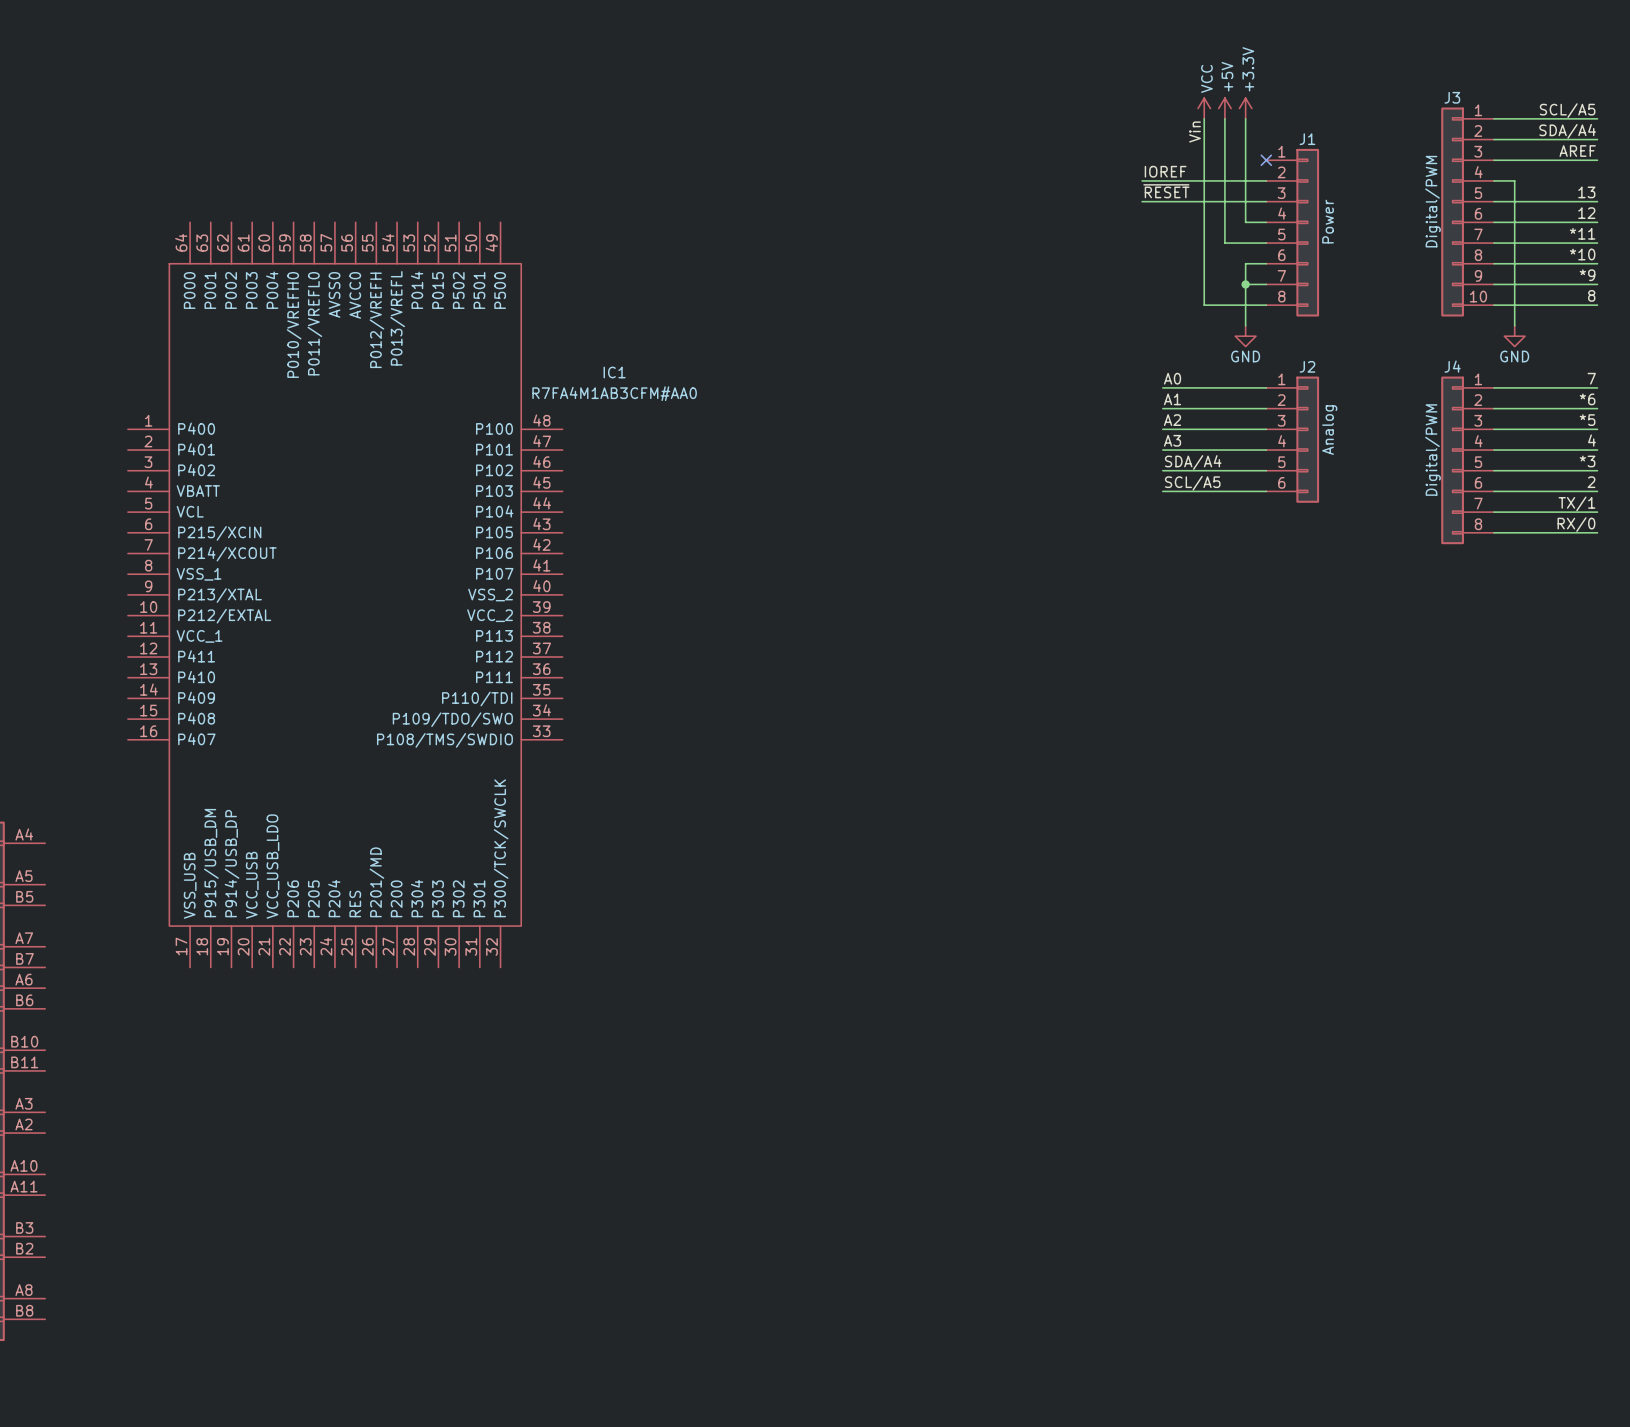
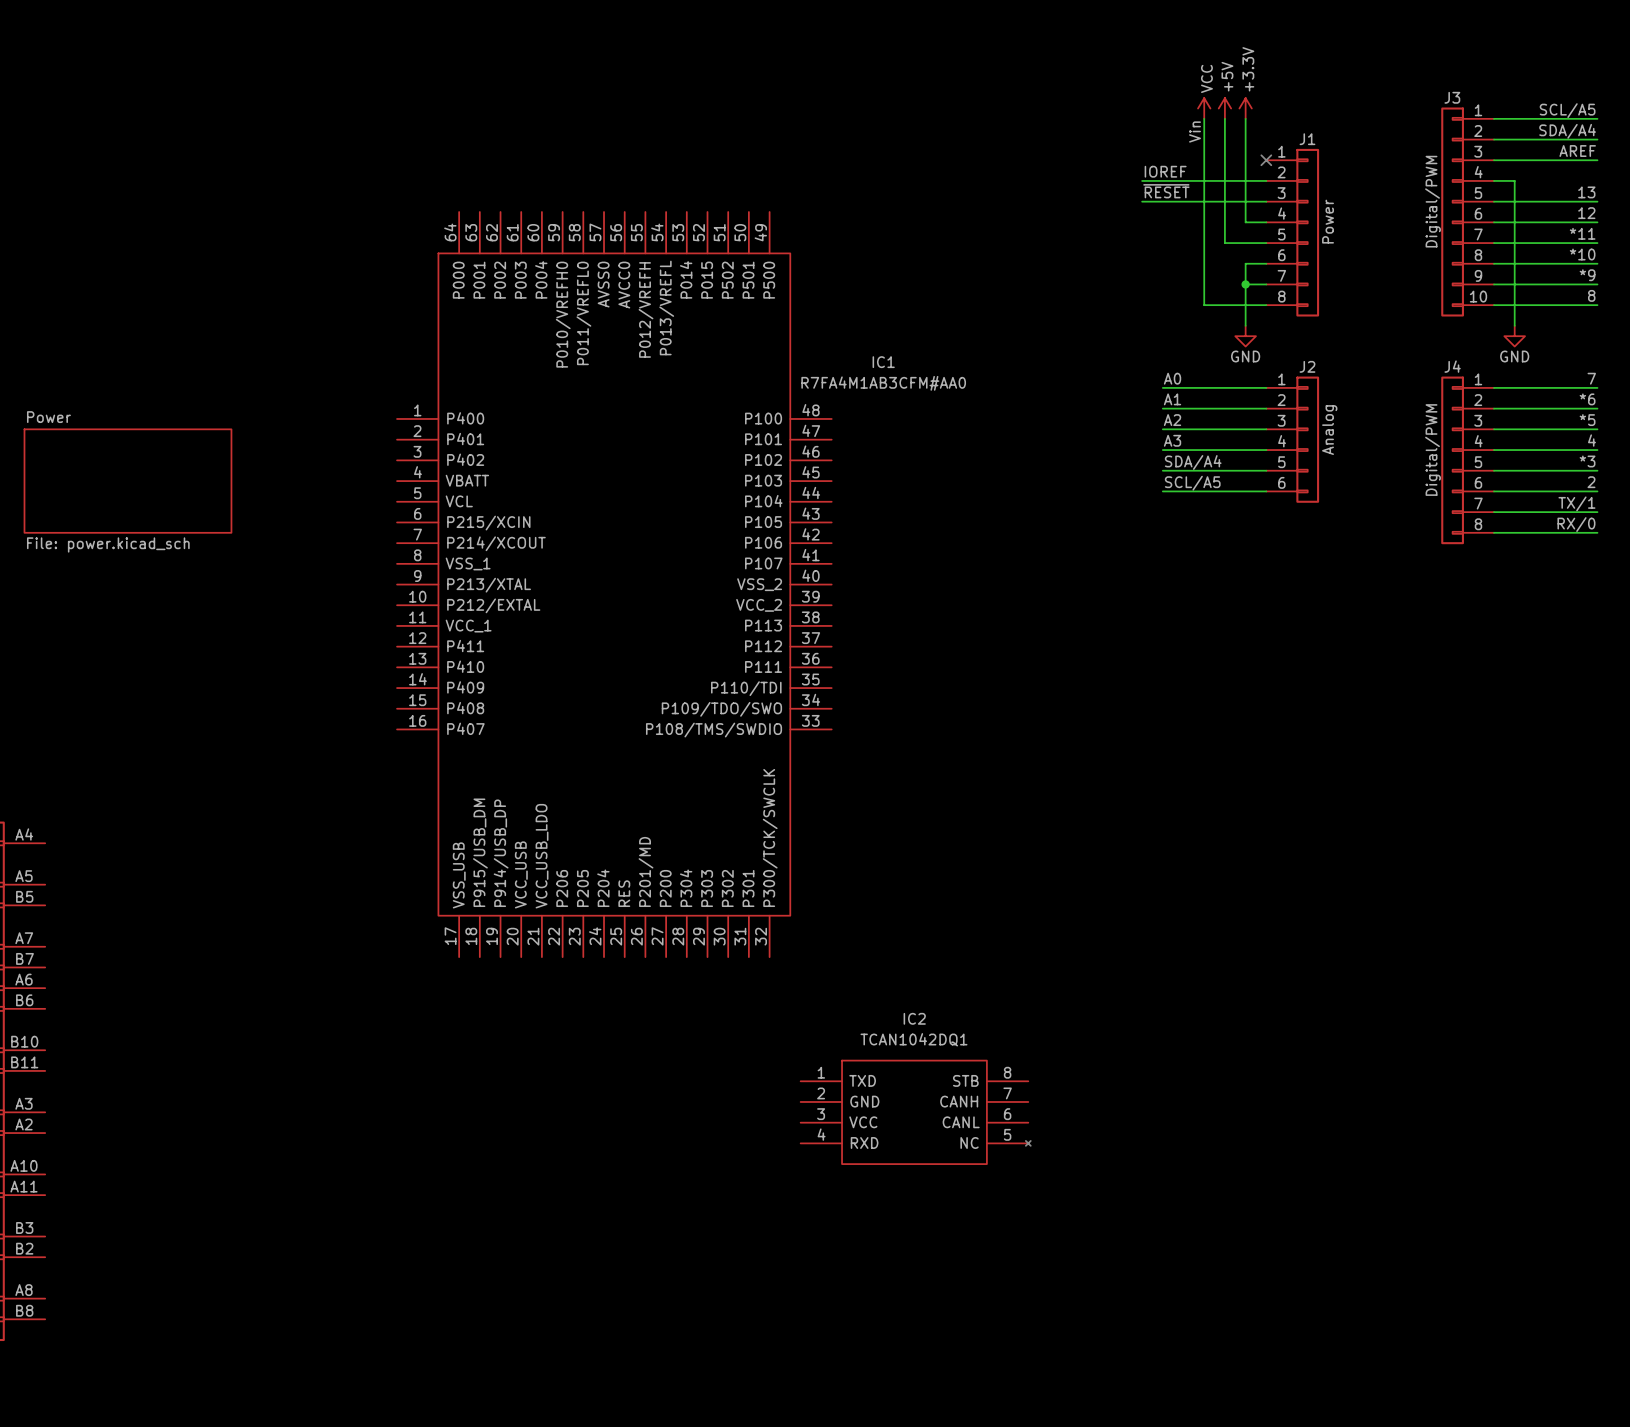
sheet Power: none -> File: power.kicad_sch (127, 481)
IC1 position: (345, 594) -> (614, 584)
IC2: none -> TCAN1042DQ1 (915, 1112)

